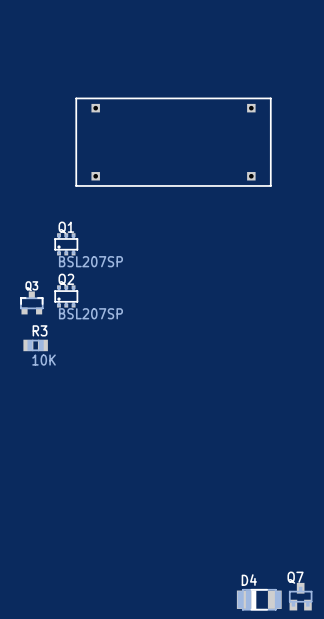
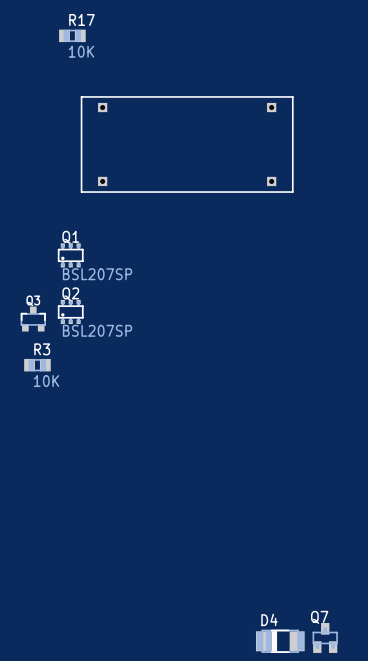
R17: none -> 10K (72, 35)

